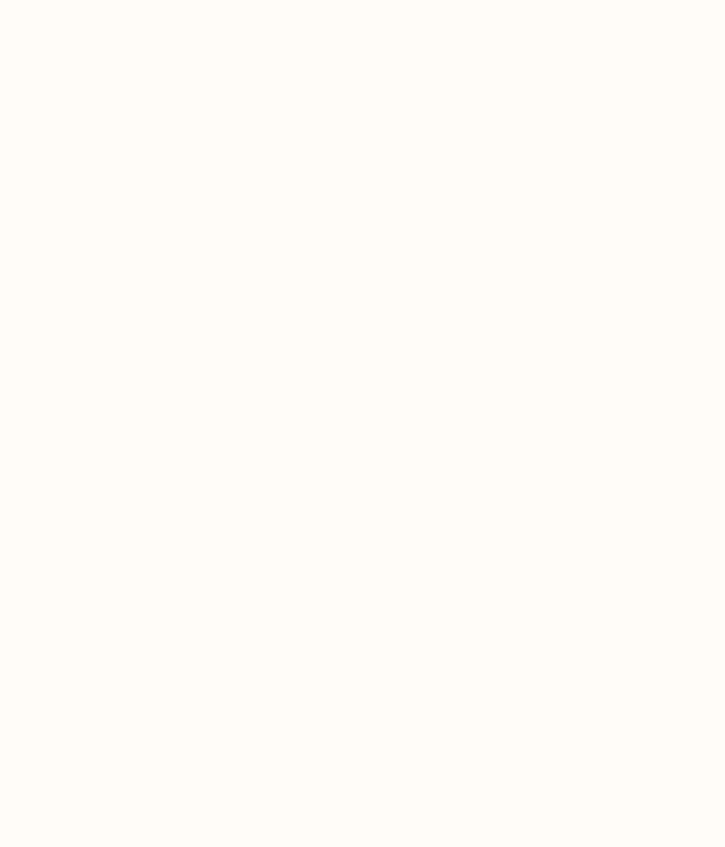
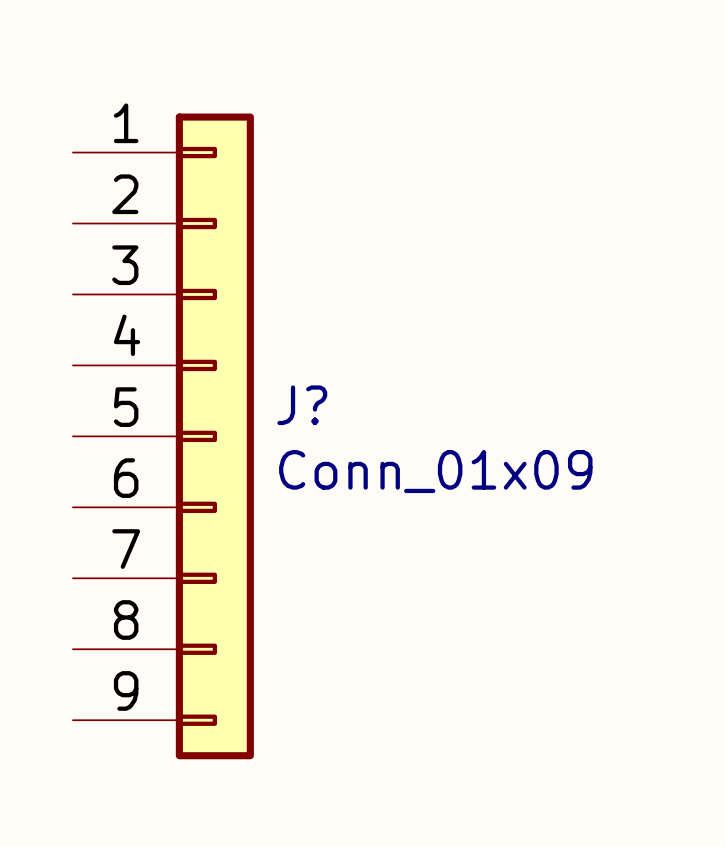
J?: none -> Conn_01x09 (163, 436)

